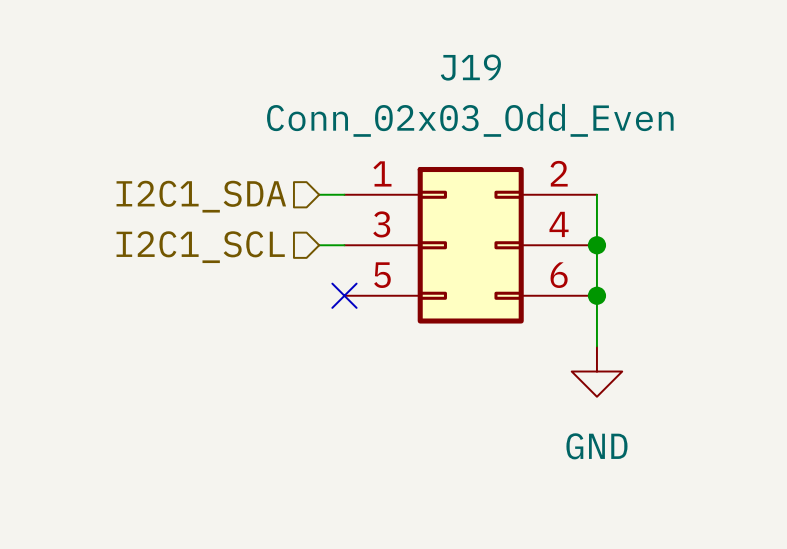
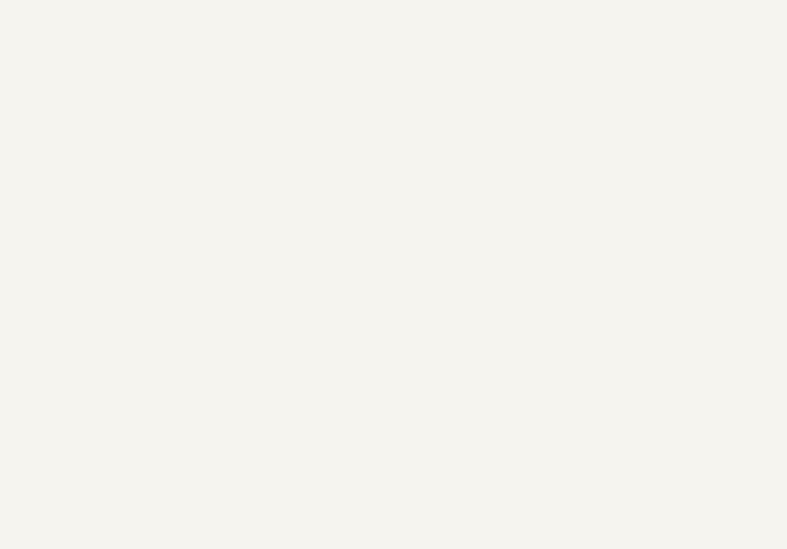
wire: (319, 194) (344, 194) -> none
wire: (596, 194) (596, 346) -> none
hierarchical label: I2C1_SDA (201, 196) -> none
wire: (319, 245) (344, 245) -> none
J19: Conn_02x03_Odd_Even (470, 245) -> none
junction: (596, 245) -> none
hierarchical label: I2C1_SCL (200, 247) -> none
no-connect mark: (344, 295) -> none
junction: (596, 295) -> none
power symbol: GND (596, 371) -> none

